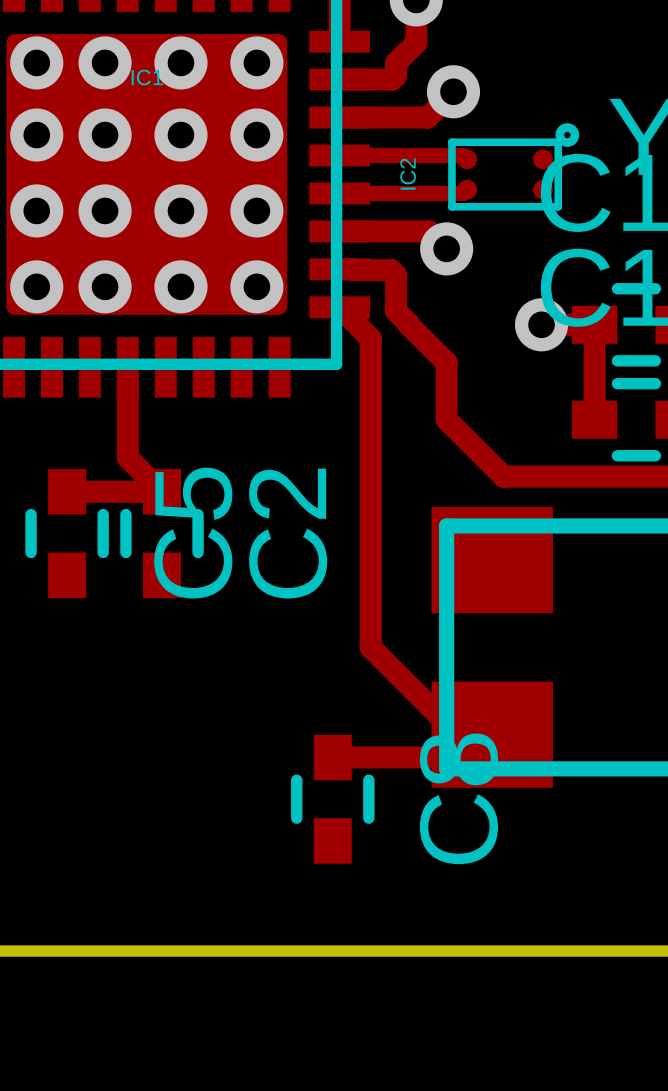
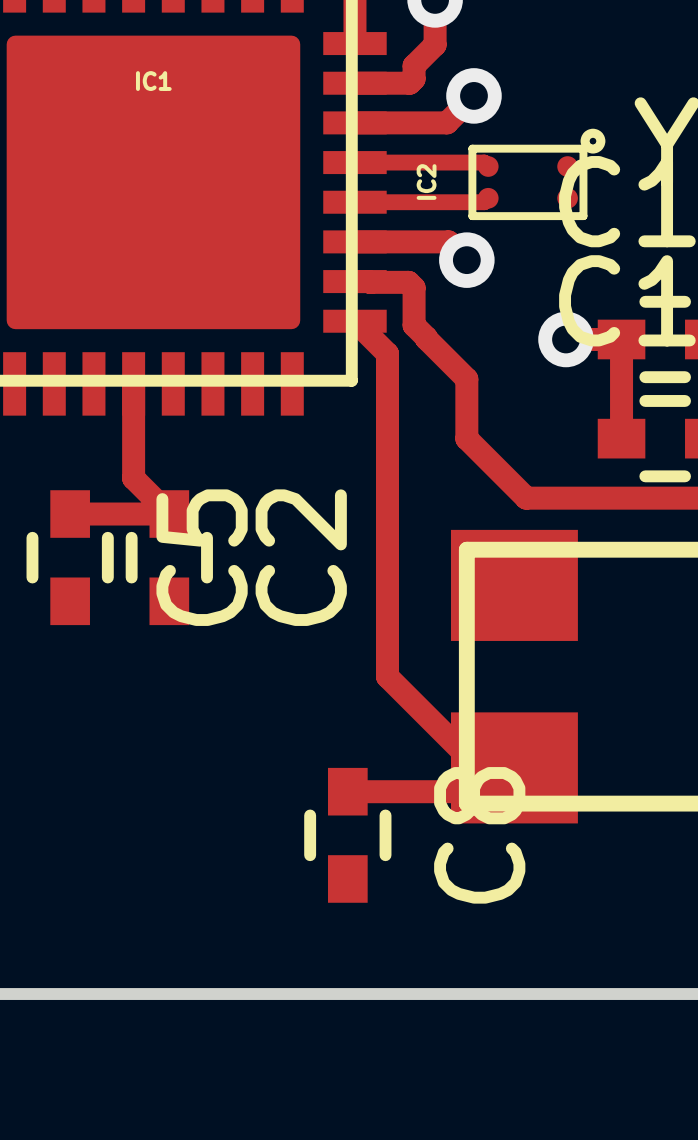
via: (36, 62) -> none
via: (105, 62) -> none
via: (180, 62) -> none
via: (256, 62) -> none
via: (36, 135) -> none
via: (105, 135) -> none
via: (180, 135) -> none
via: (256, 135) -> none
via: (36, 210) -> none
via: (105, 210) -> none
via: (180, 210) -> none
via: (256, 210) -> none
via: (36, 286) -> none
via: (105, 286) -> none
via: (180, 286) -> none
via: (256, 286) -> none

